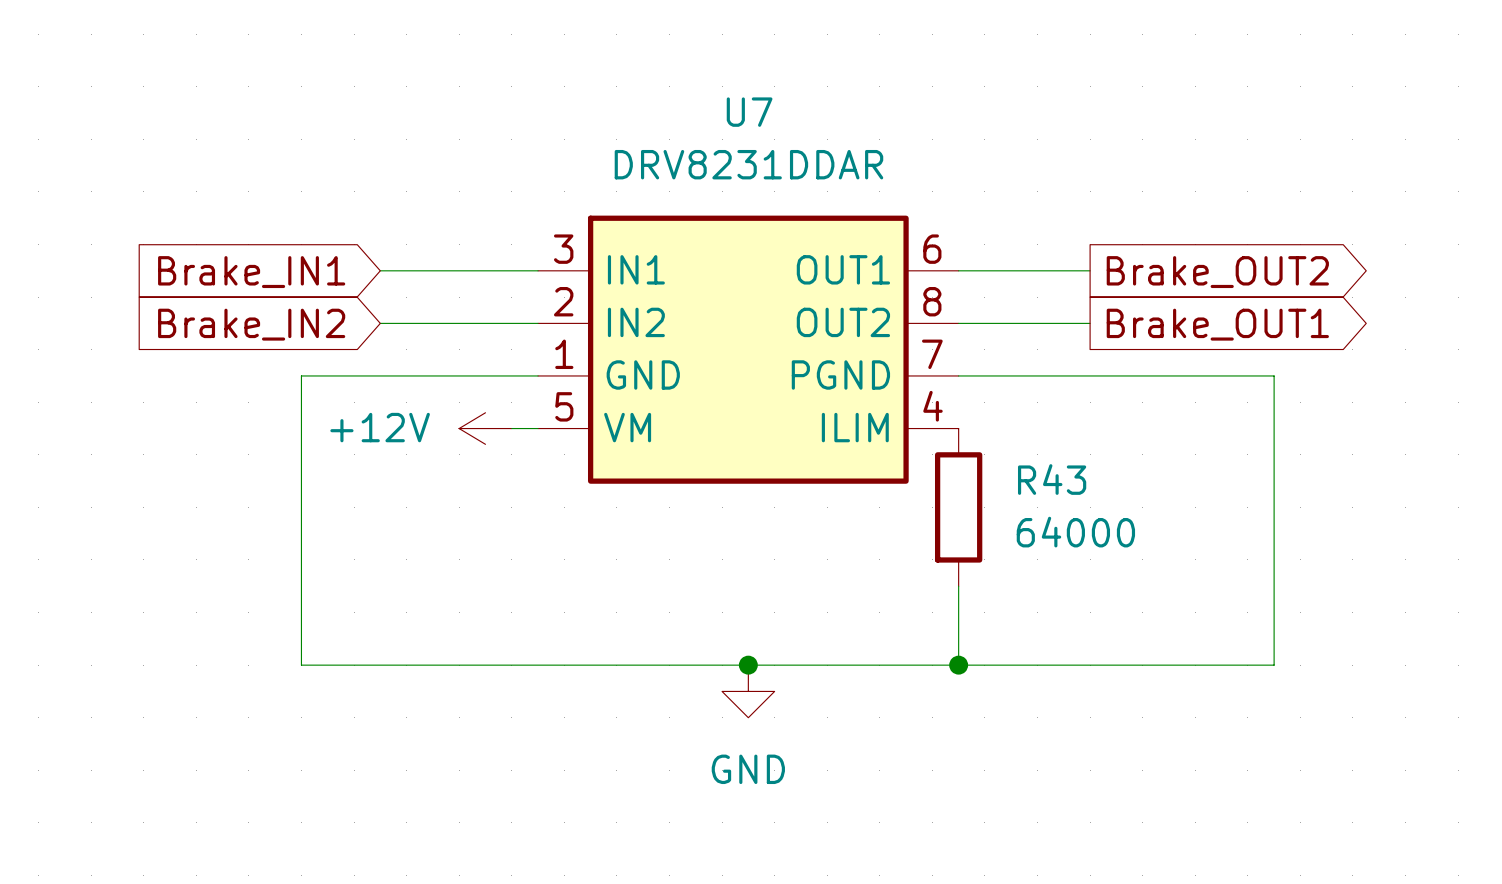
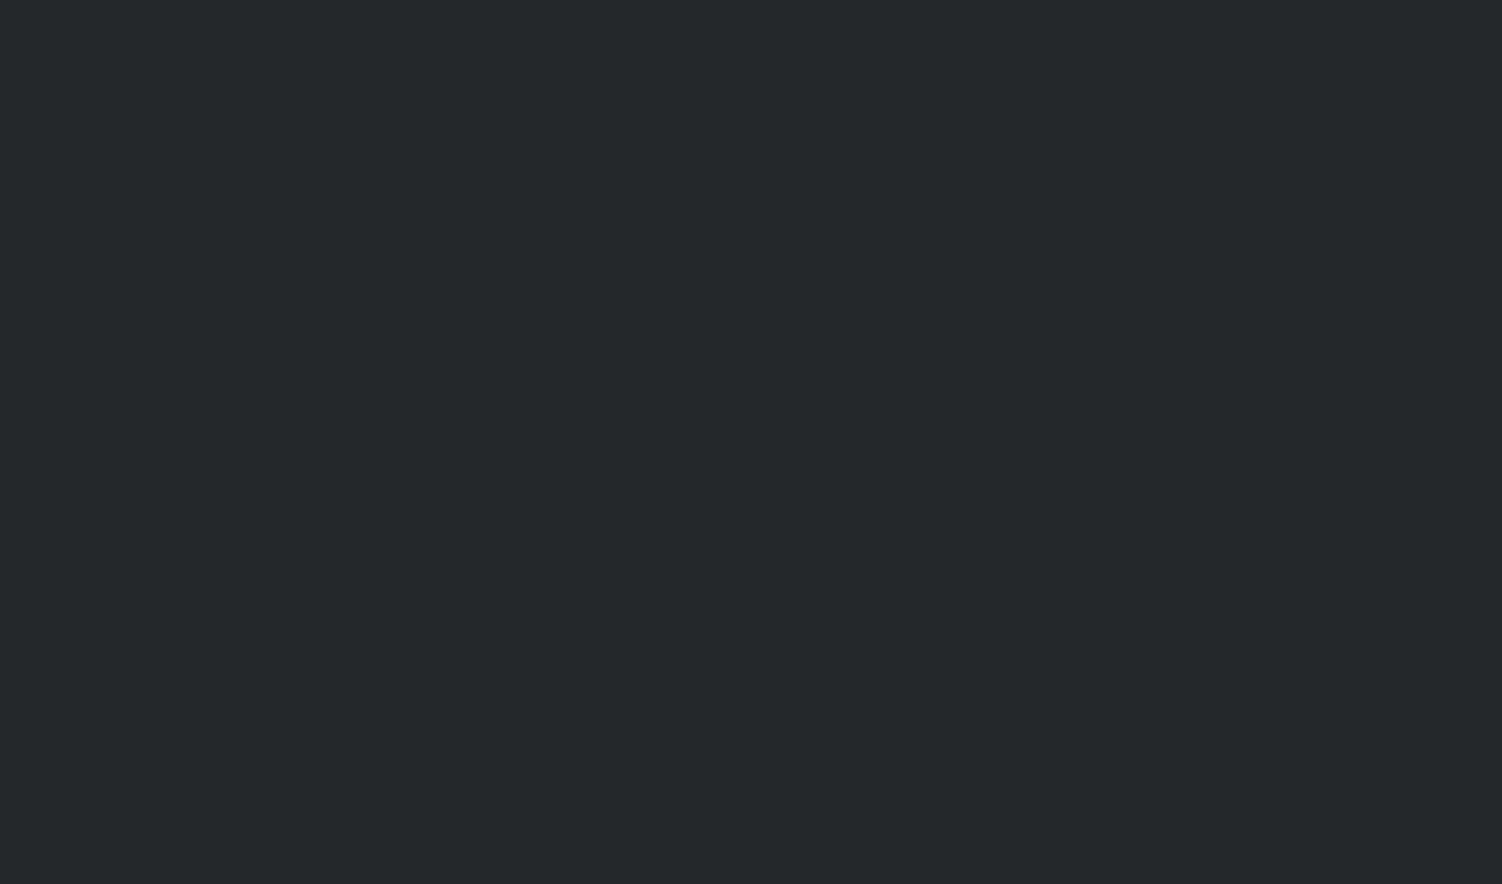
wire: (380, 270) (538, 270) -> none
wire: (958, 270) (1090, 270) -> none
global label: Brake_IN1 (251, 272) -> none
global label: Brake_OUT2 (1217, 272) -> none
wire: (380, 323) (538, 323) -> none
wire: (958, 323) (1090, 323) -> none
global label: Brake_IN2 (251, 324) -> none
global label: Brake_OUT1 (1217, 324) -> none
U7: DRV8231DDAR (748, 349) -> none
wire: (538, 375) (301, 375) (301, 665) (1274, 665) (1274, 375) (958, 375) -> none
power symbol: +12V (485, 428) -> none
wire: (511, 428) (538, 428) -> none
R43: 64000 (958, 507) -> none
wire: (958, 586) (958, 665) -> none
junction: (748, 665) -> none
junction: (958, 665) -> none
power symbol: GND (748, 691) -> none

